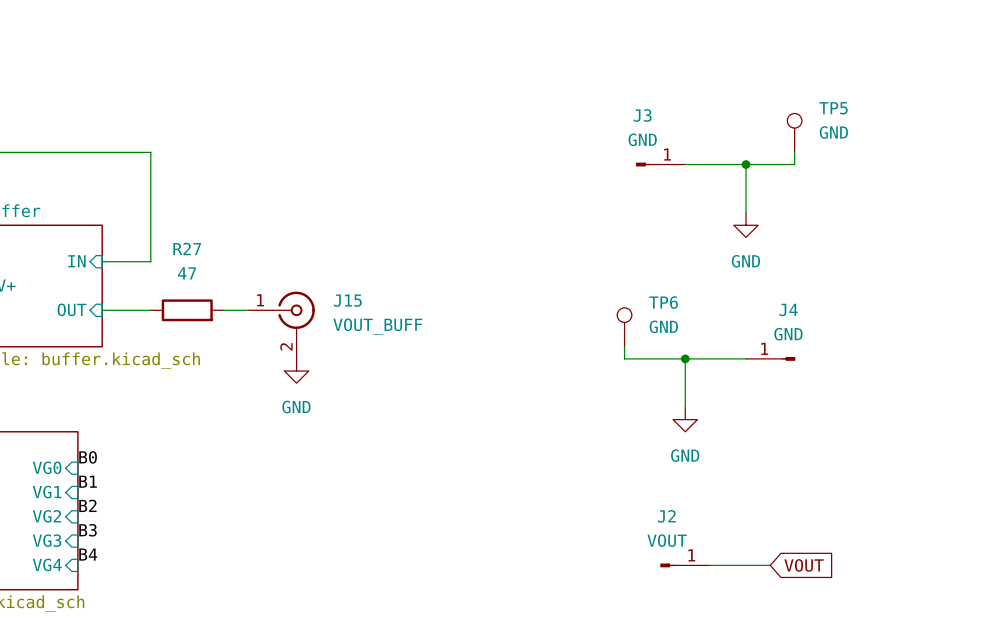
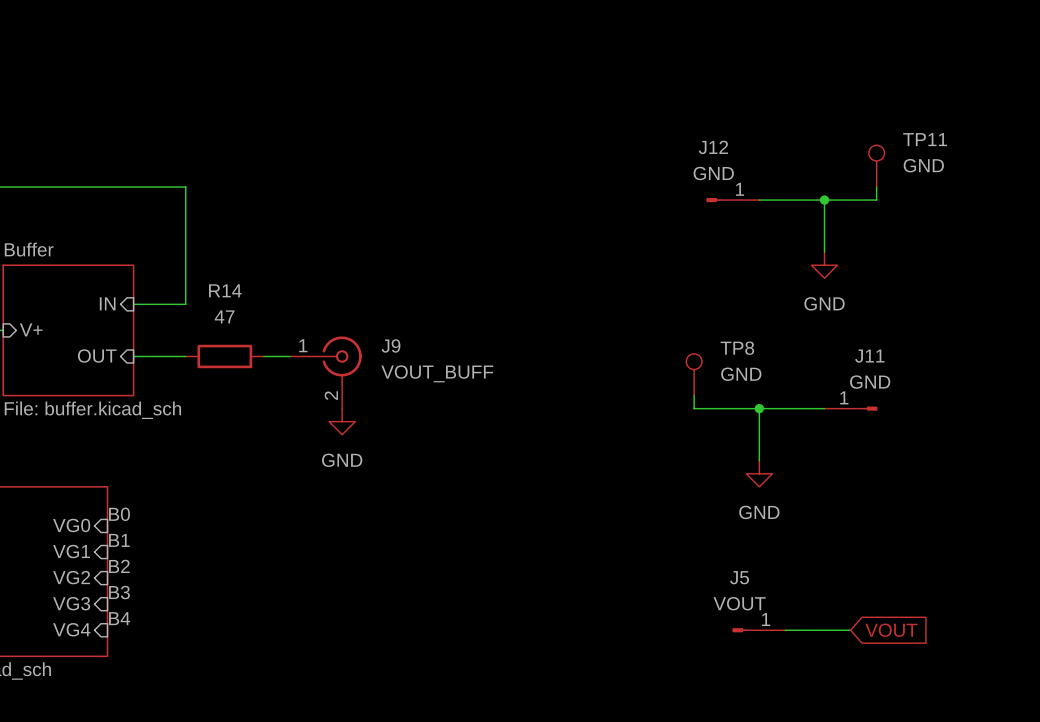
TP5 name: TP5 (833, 108) -> TP11 (925, 139)
J3 name: J3 (642, 115) -> J12 (713, 147)
R27 name: R27 (187, 249) -> R14 (225, 290)
J15 name: J15 (347, 300) -> J9 (390, 345)
TP6 name: TP6 (663, 302) -> TP8 (737, 348)
J4 name: J4 (788, 309) -> J11 (869, 356)
J2 name: J2 (666, 516) -> J5 (739, 577)

